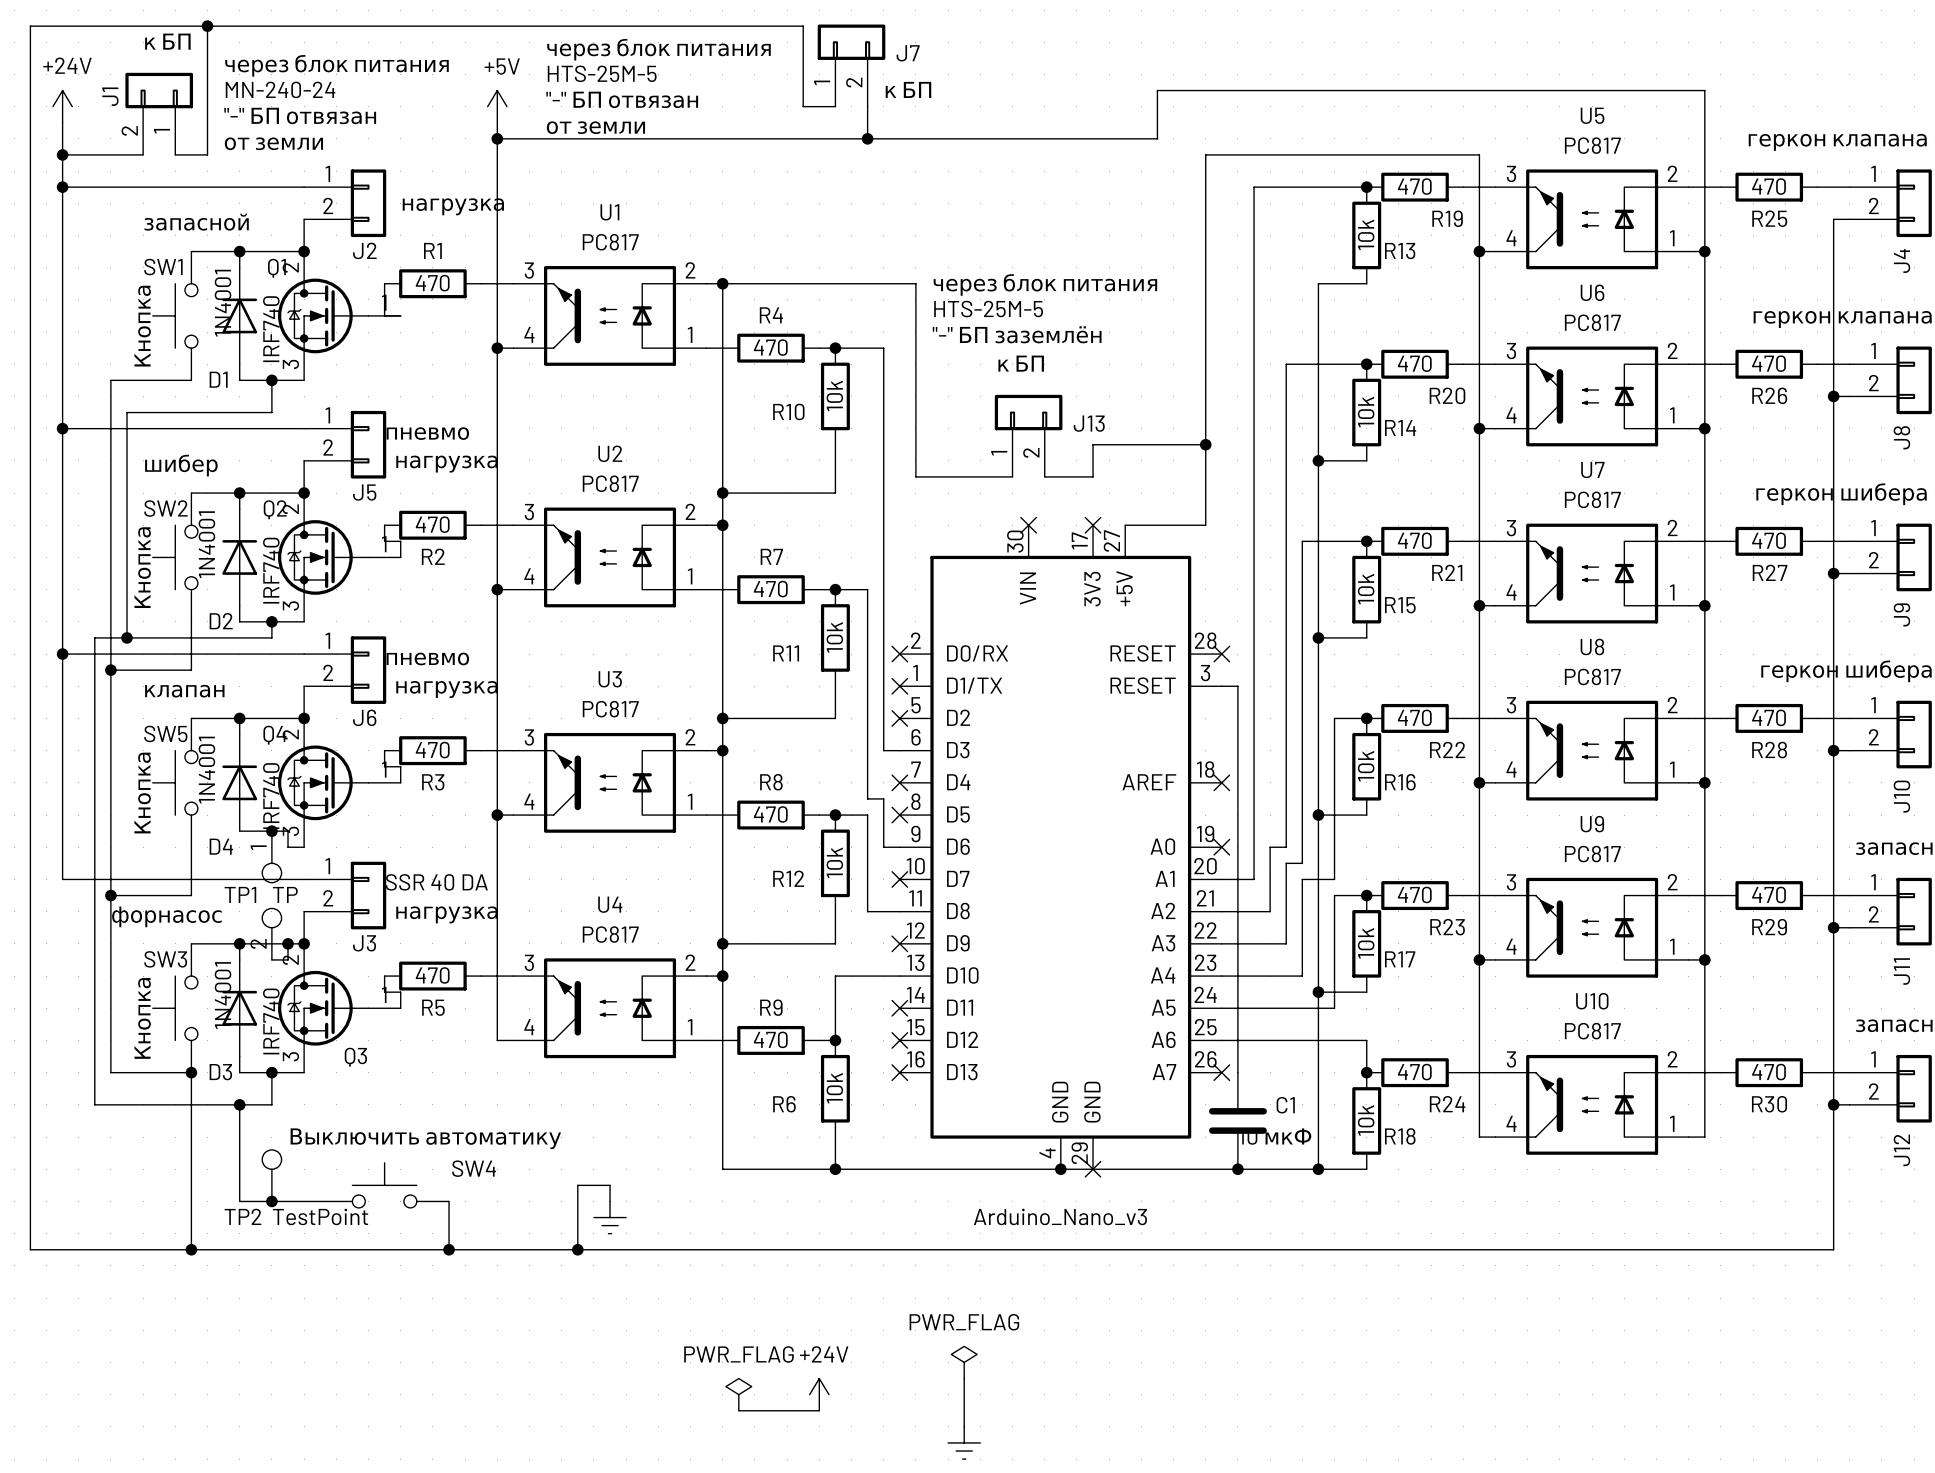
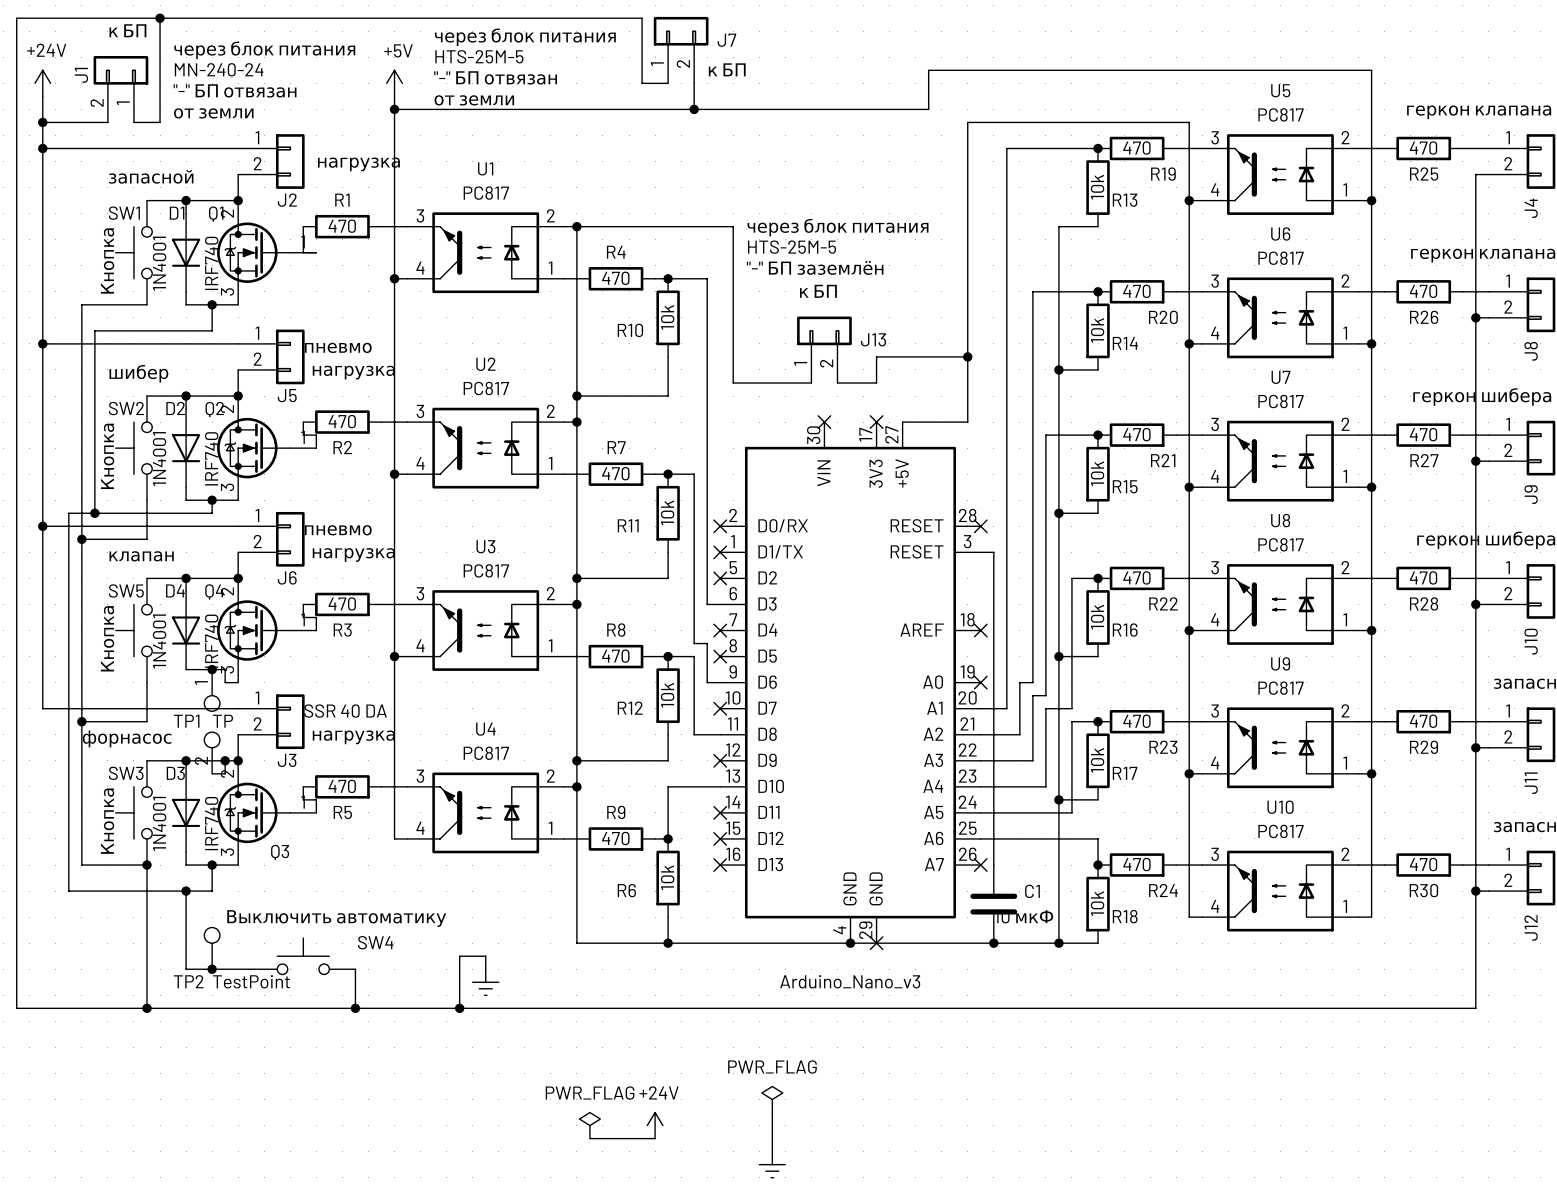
D1 rotation: 0° (239, 315) -> 180° (186, 252)
D1 name position: D1 (218, 379) -> D1 (177, 213)
D2 rotation: 0° (239, 557) -> 180° (186, 448)
D2 name position: D2 (221, 621) -> D2 (175, 408)
D4 rotation: 0° (239, 782) -> 180° (186, 630)
D4 name position: D4 (221, 846) -> D4 (175, 590)
D3 rotation: 0° (239, 1008) -> 180° (186, 812)
D3 name position: D3 (220, 1072) -> D3 (175, 773)

